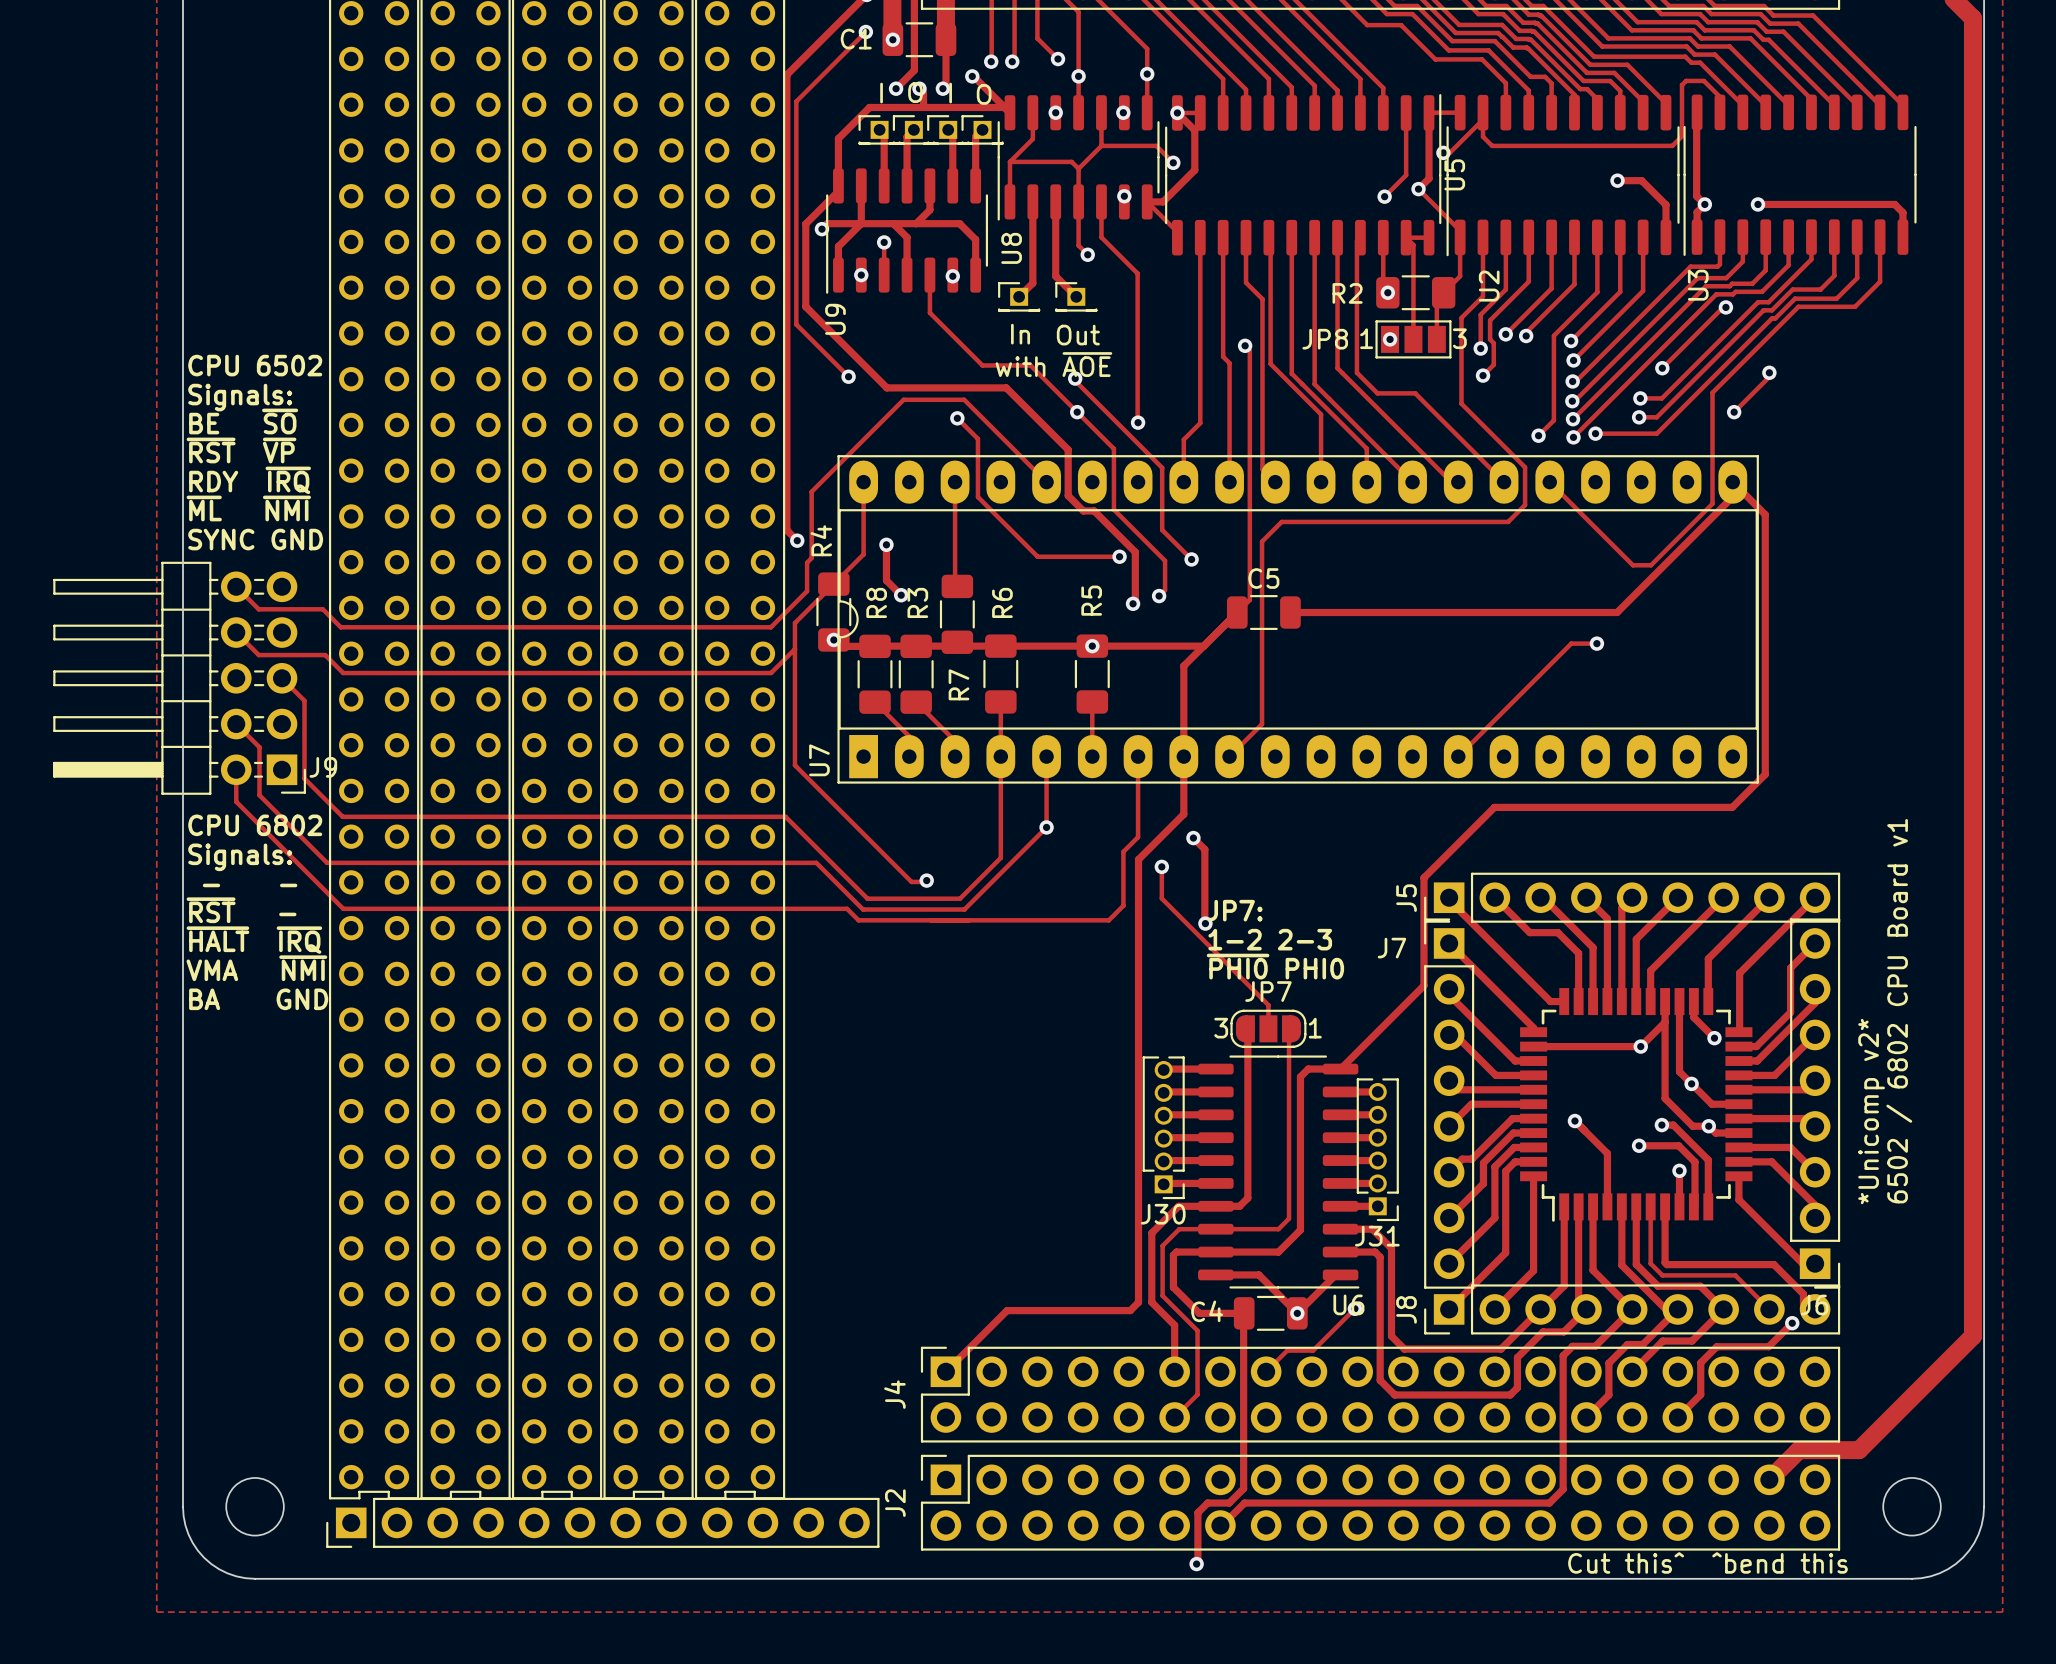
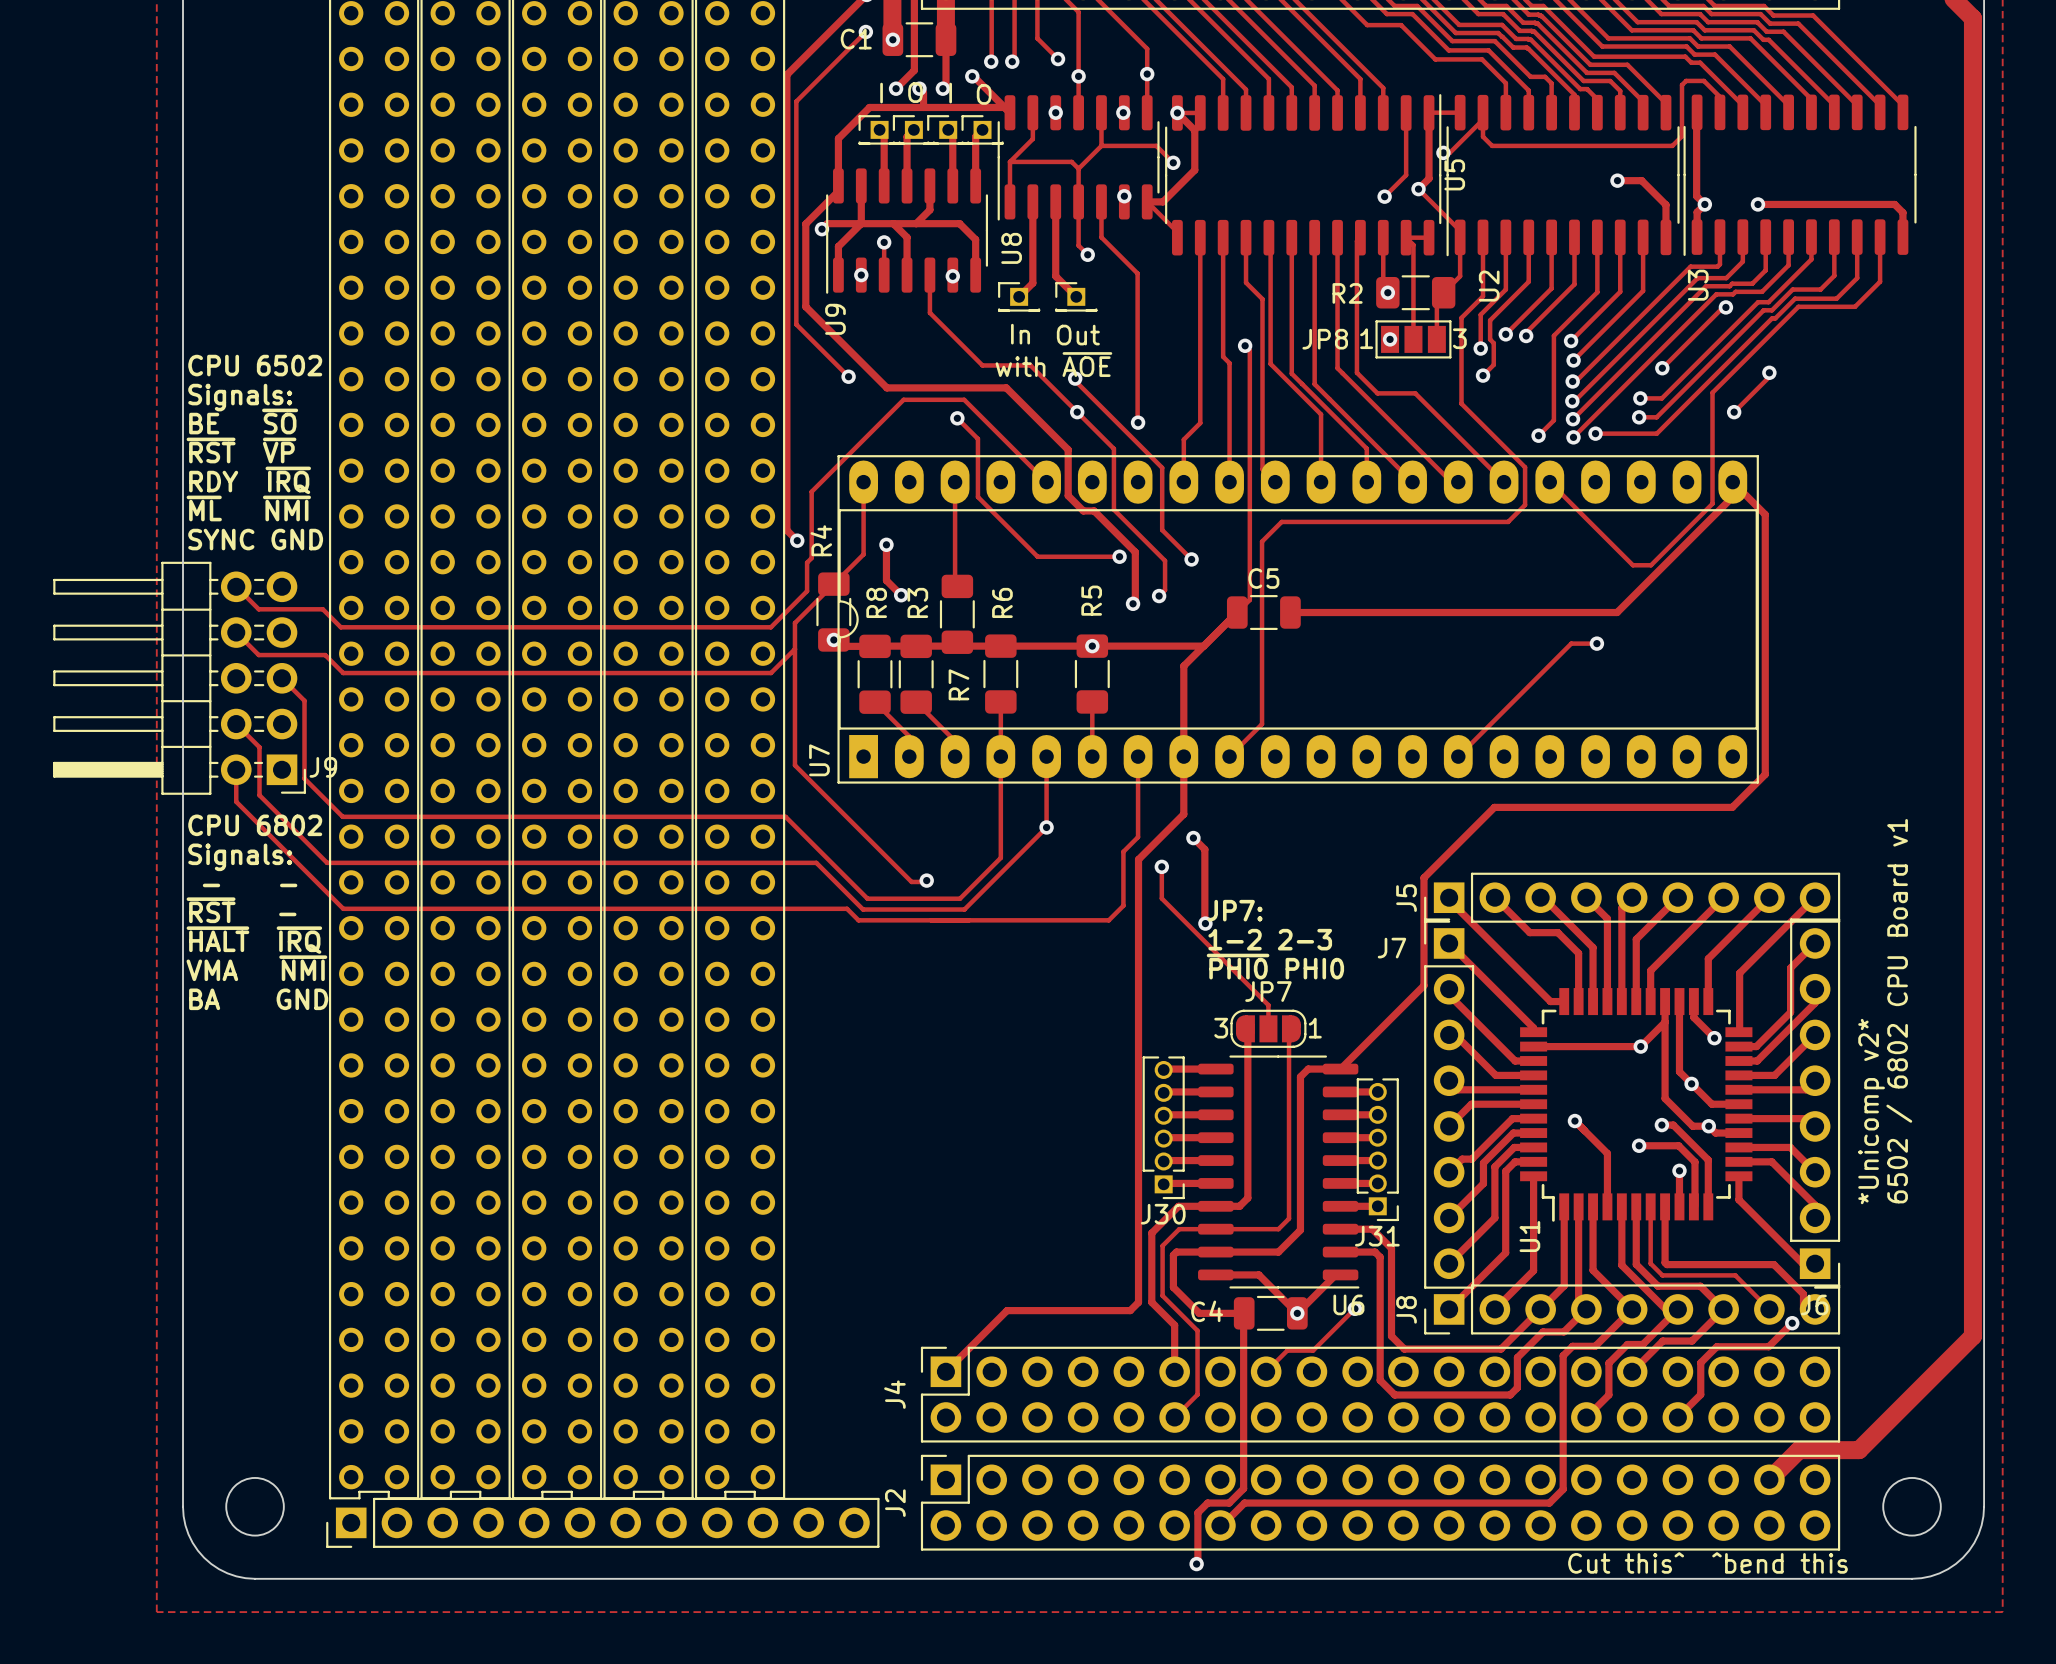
U1 name: none -> U1 (1529, 1236)

